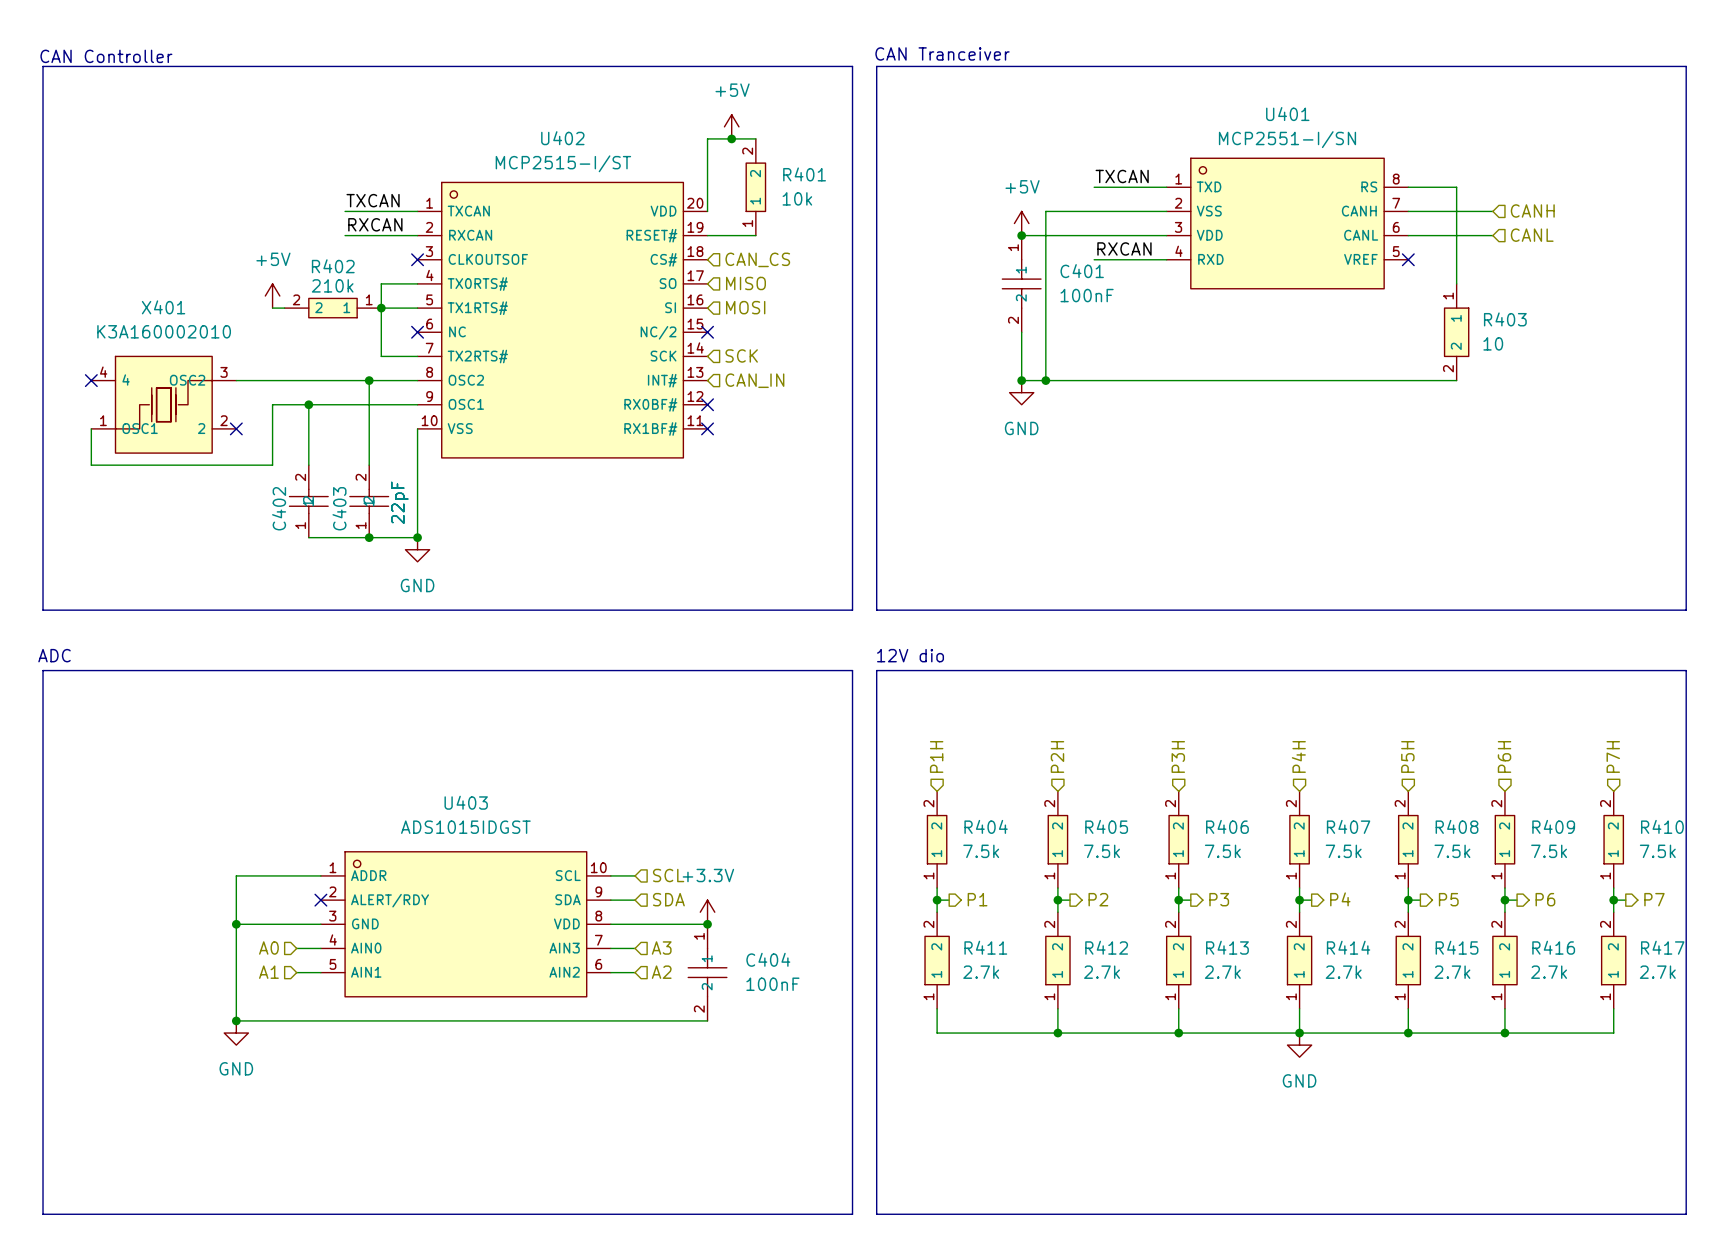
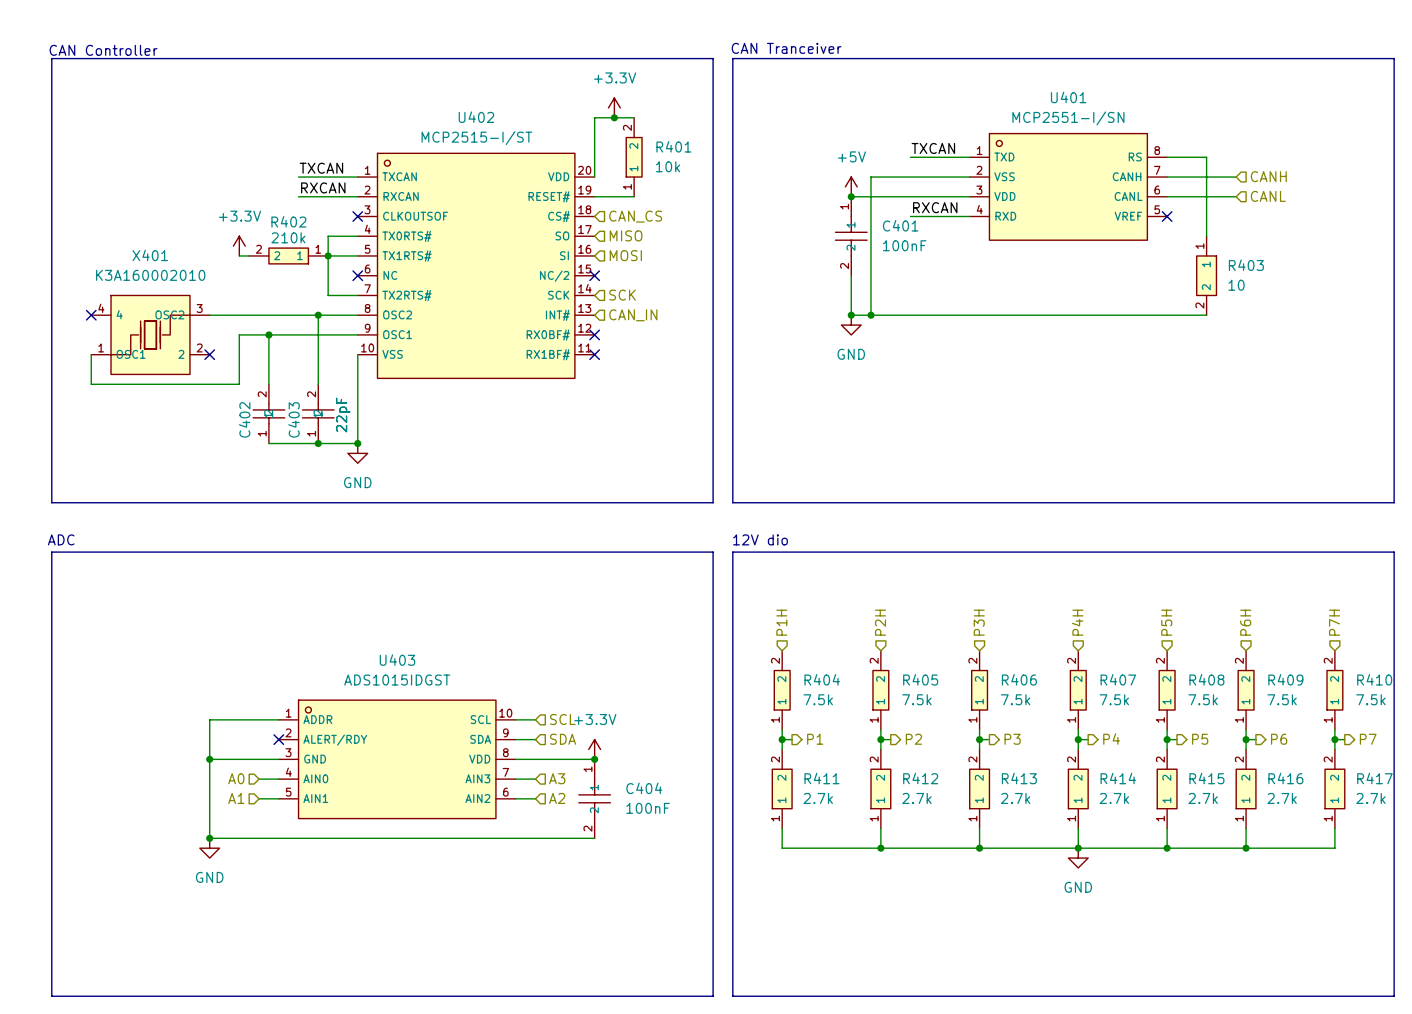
power symbol: +5V (731, 126) -> +3.3V (614, 107)
power symbol: +5V (272, 296) -> +3.3V (239, 246)

